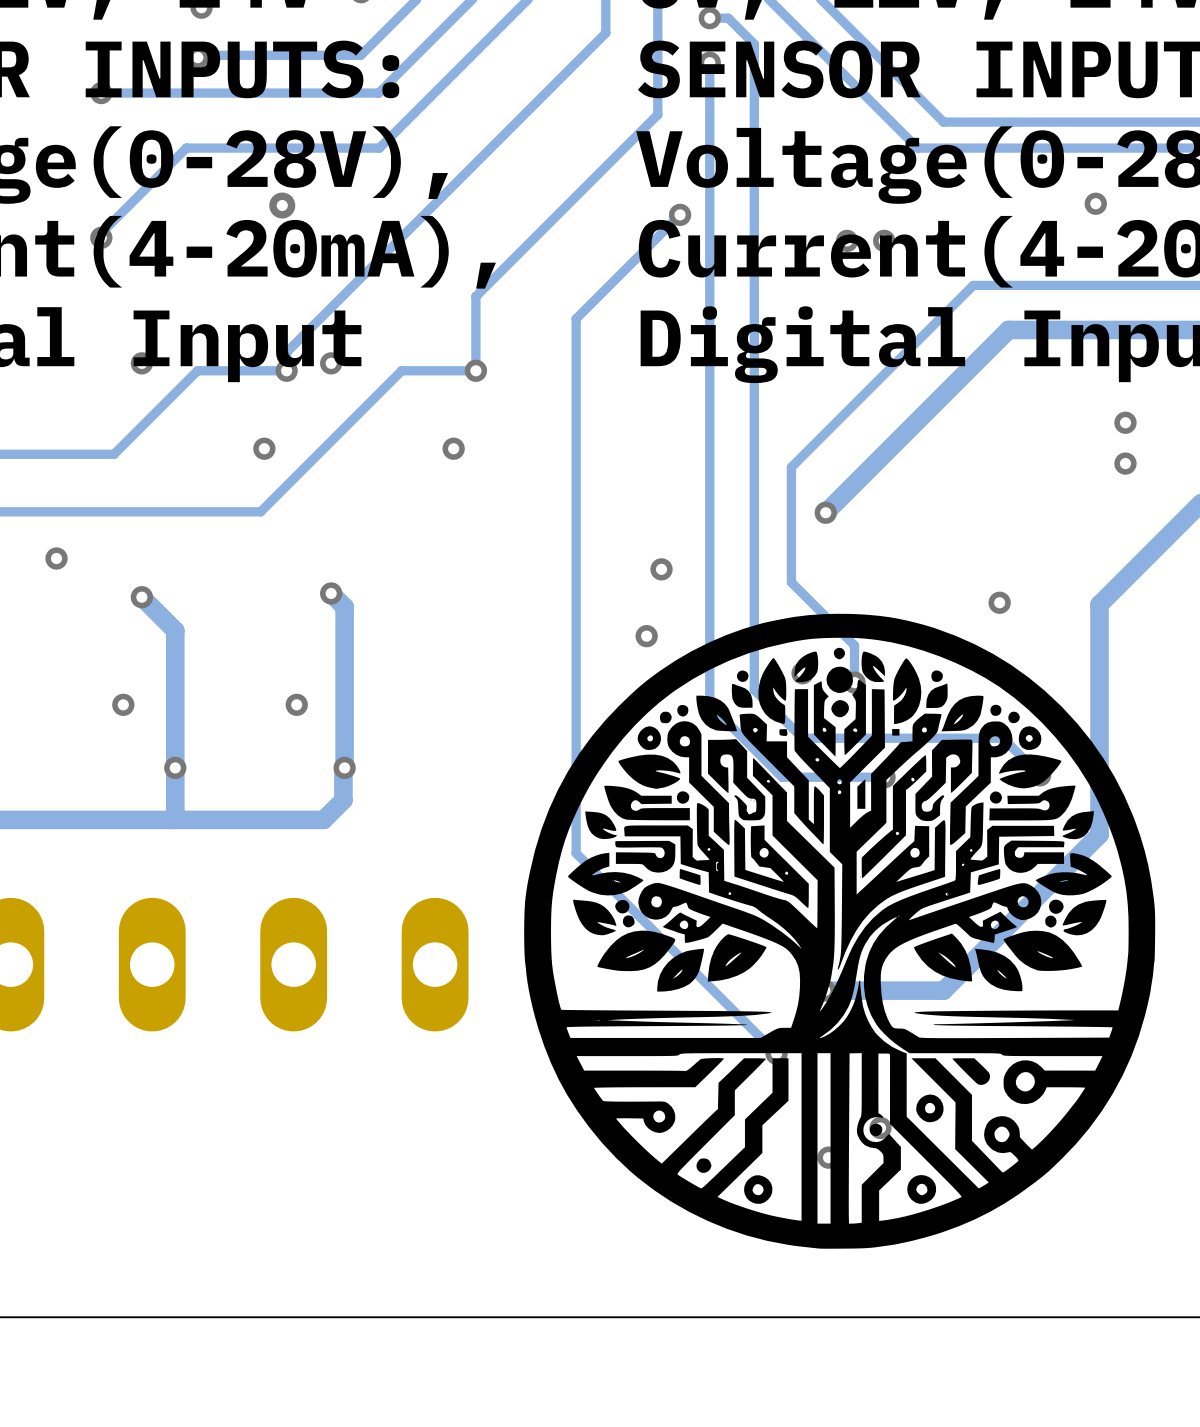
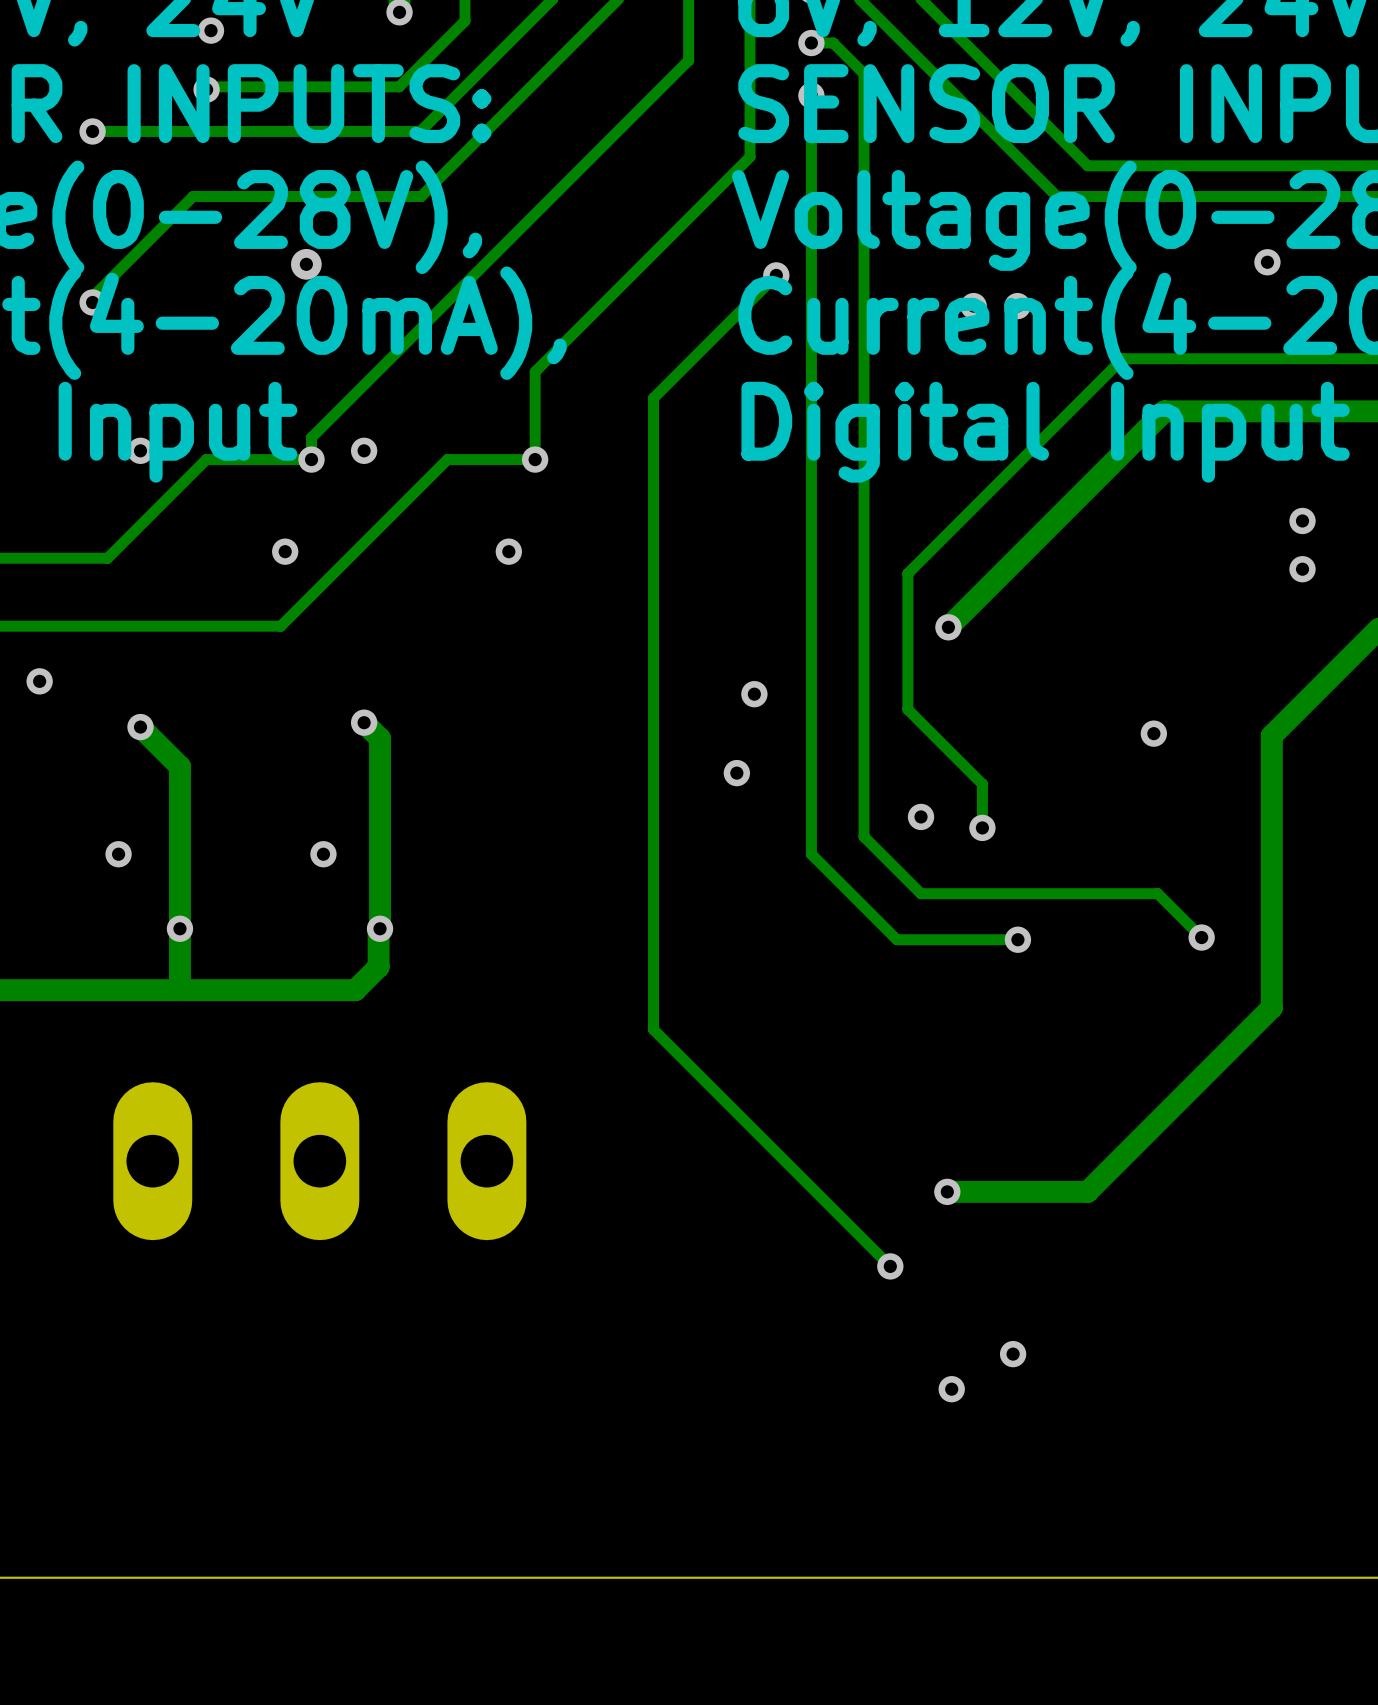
drawing: [524, 613, 1156, 1249] -> none

